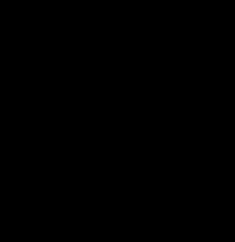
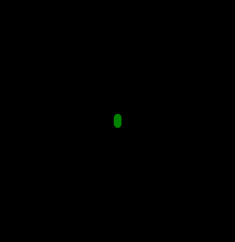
bottom track: none -> (117, 117) (117, 124)

